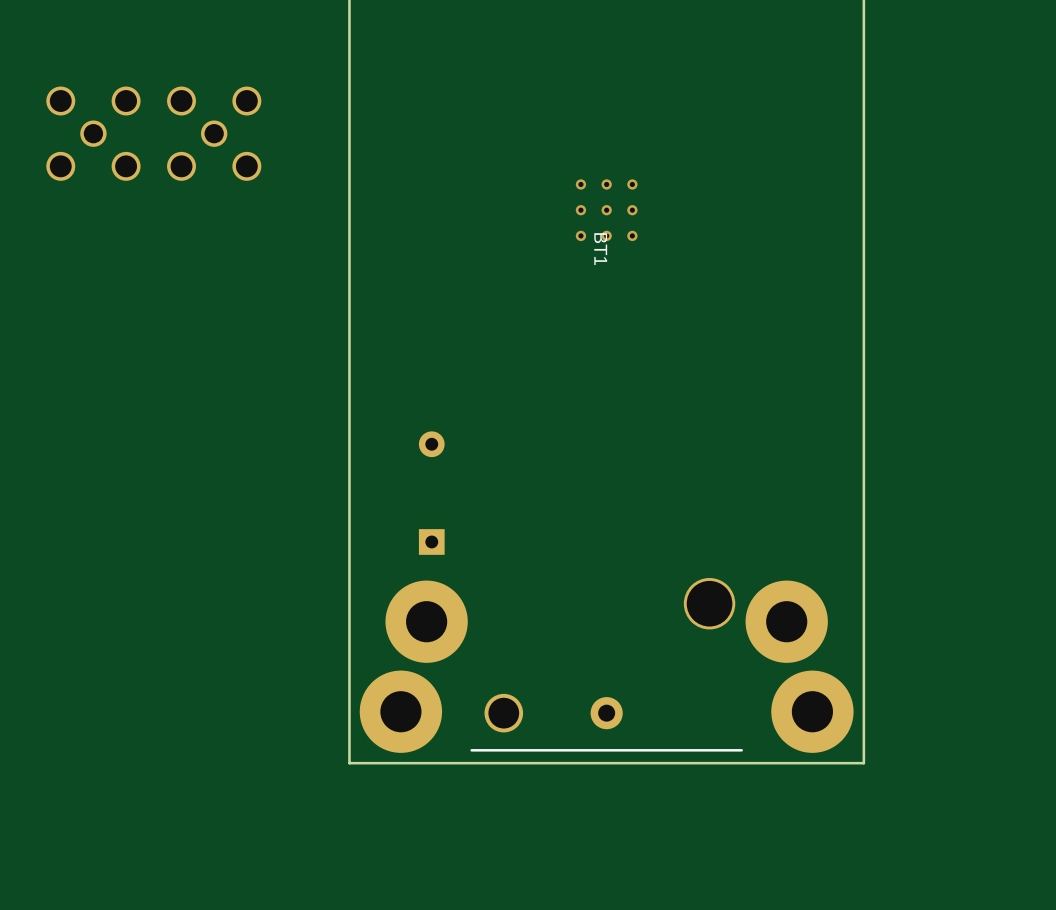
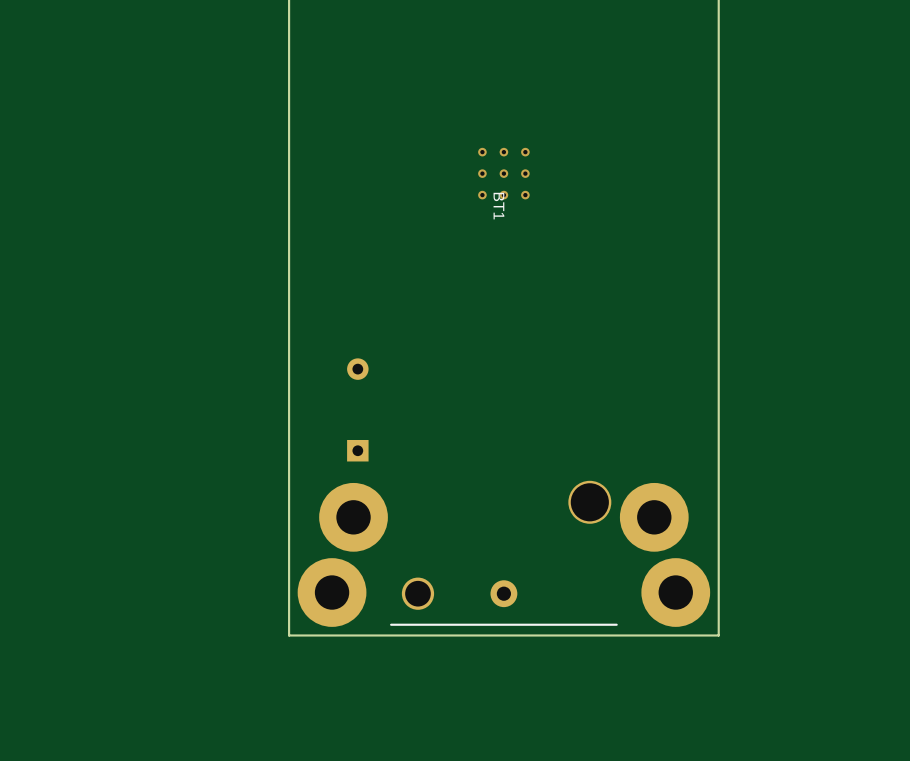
part: (93, 133) -> none
part: (214, 133) -> none

